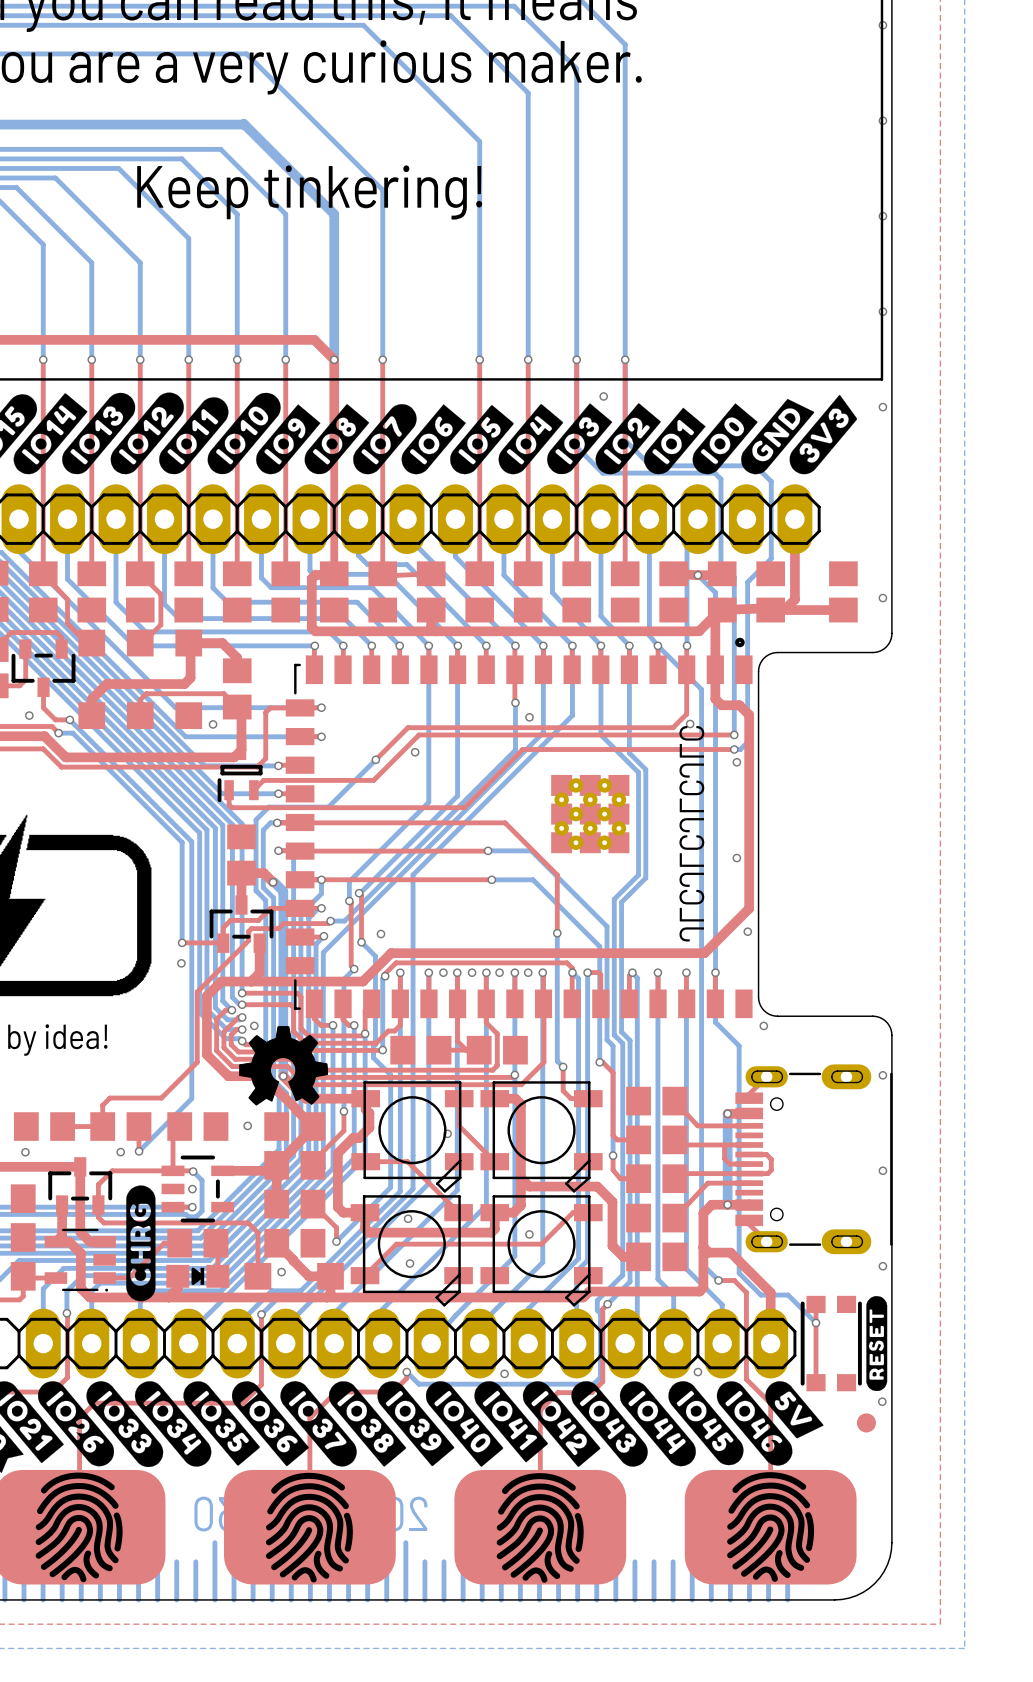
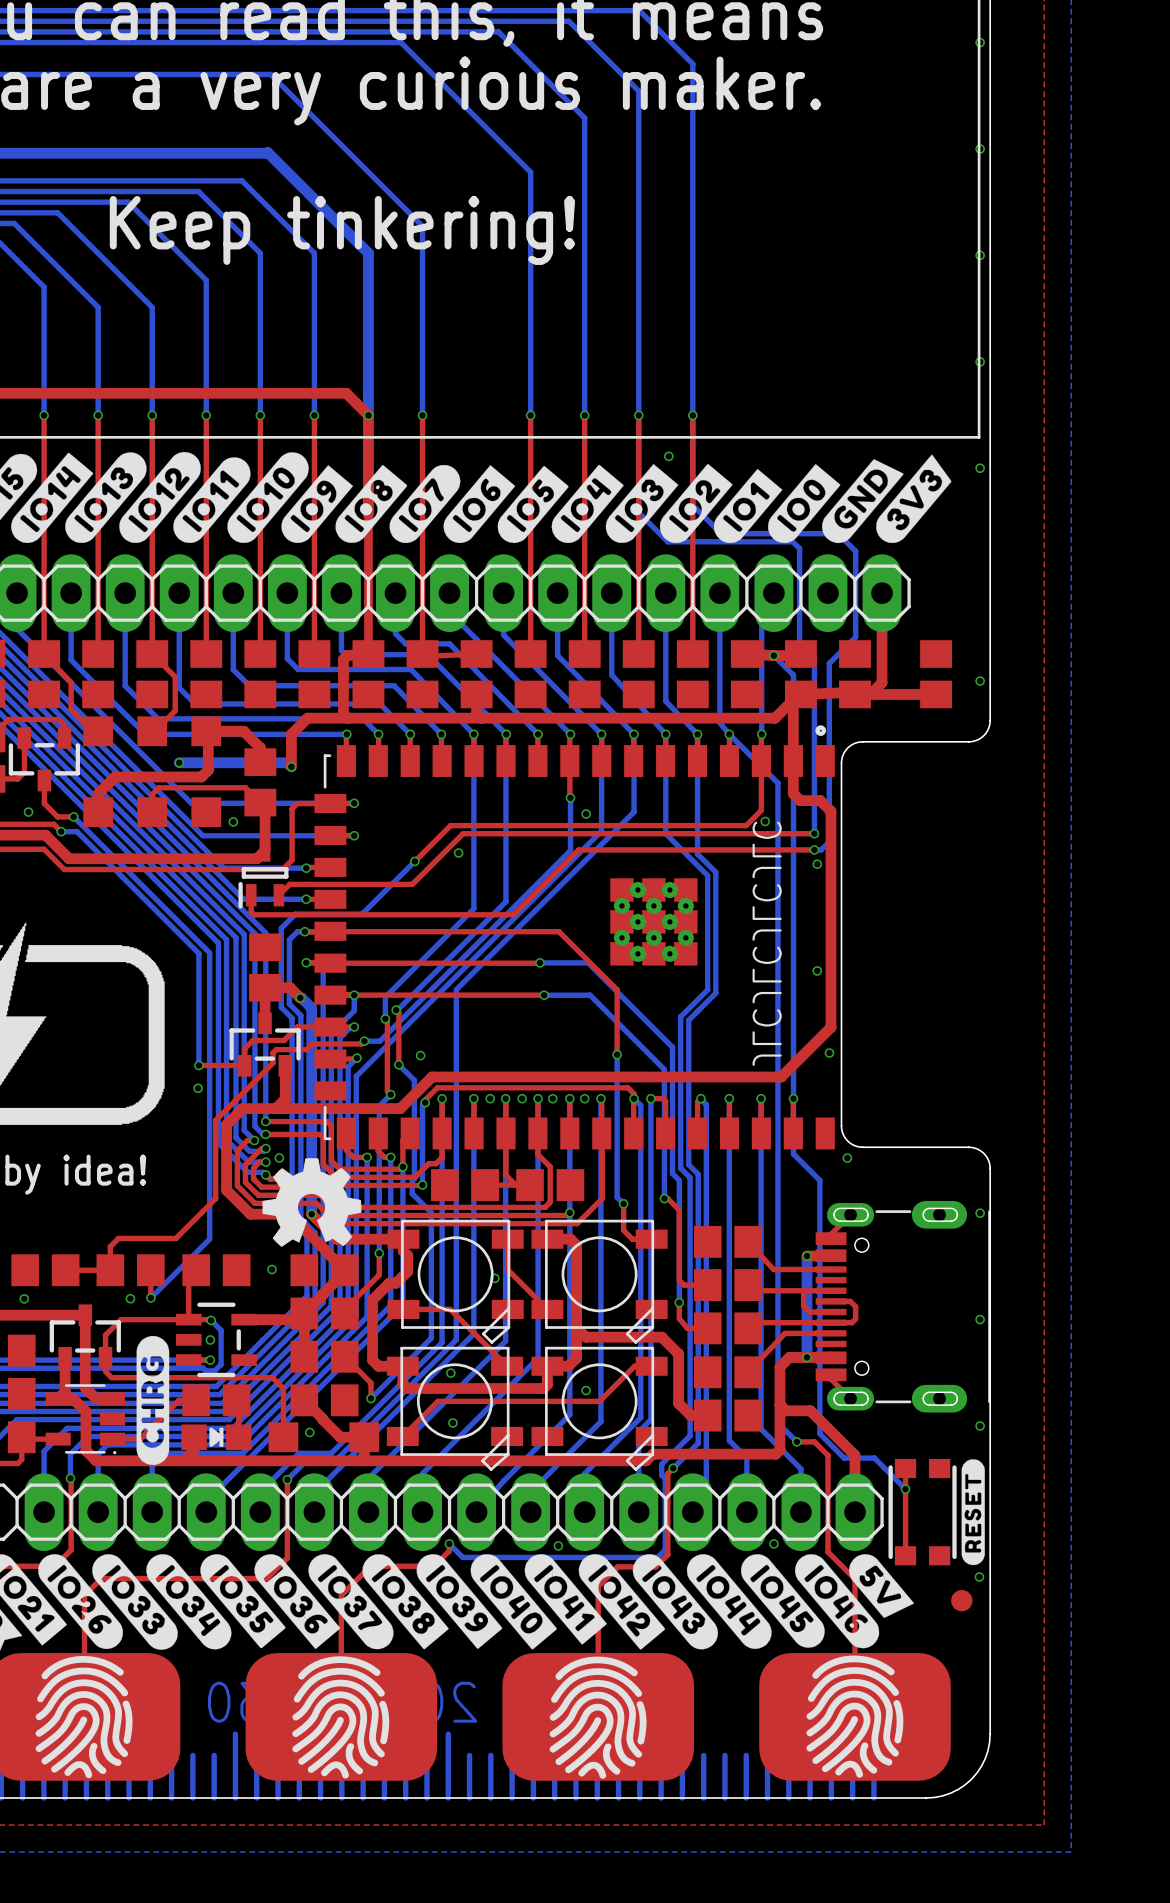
top track: none -> (347, 718) (307, 718) (291, 734) (291, 766)
bottom track: none -> (179, 762) (287, 762) (291, 766)
via: none -> (179, 762)
via: none -> (291, 766)

